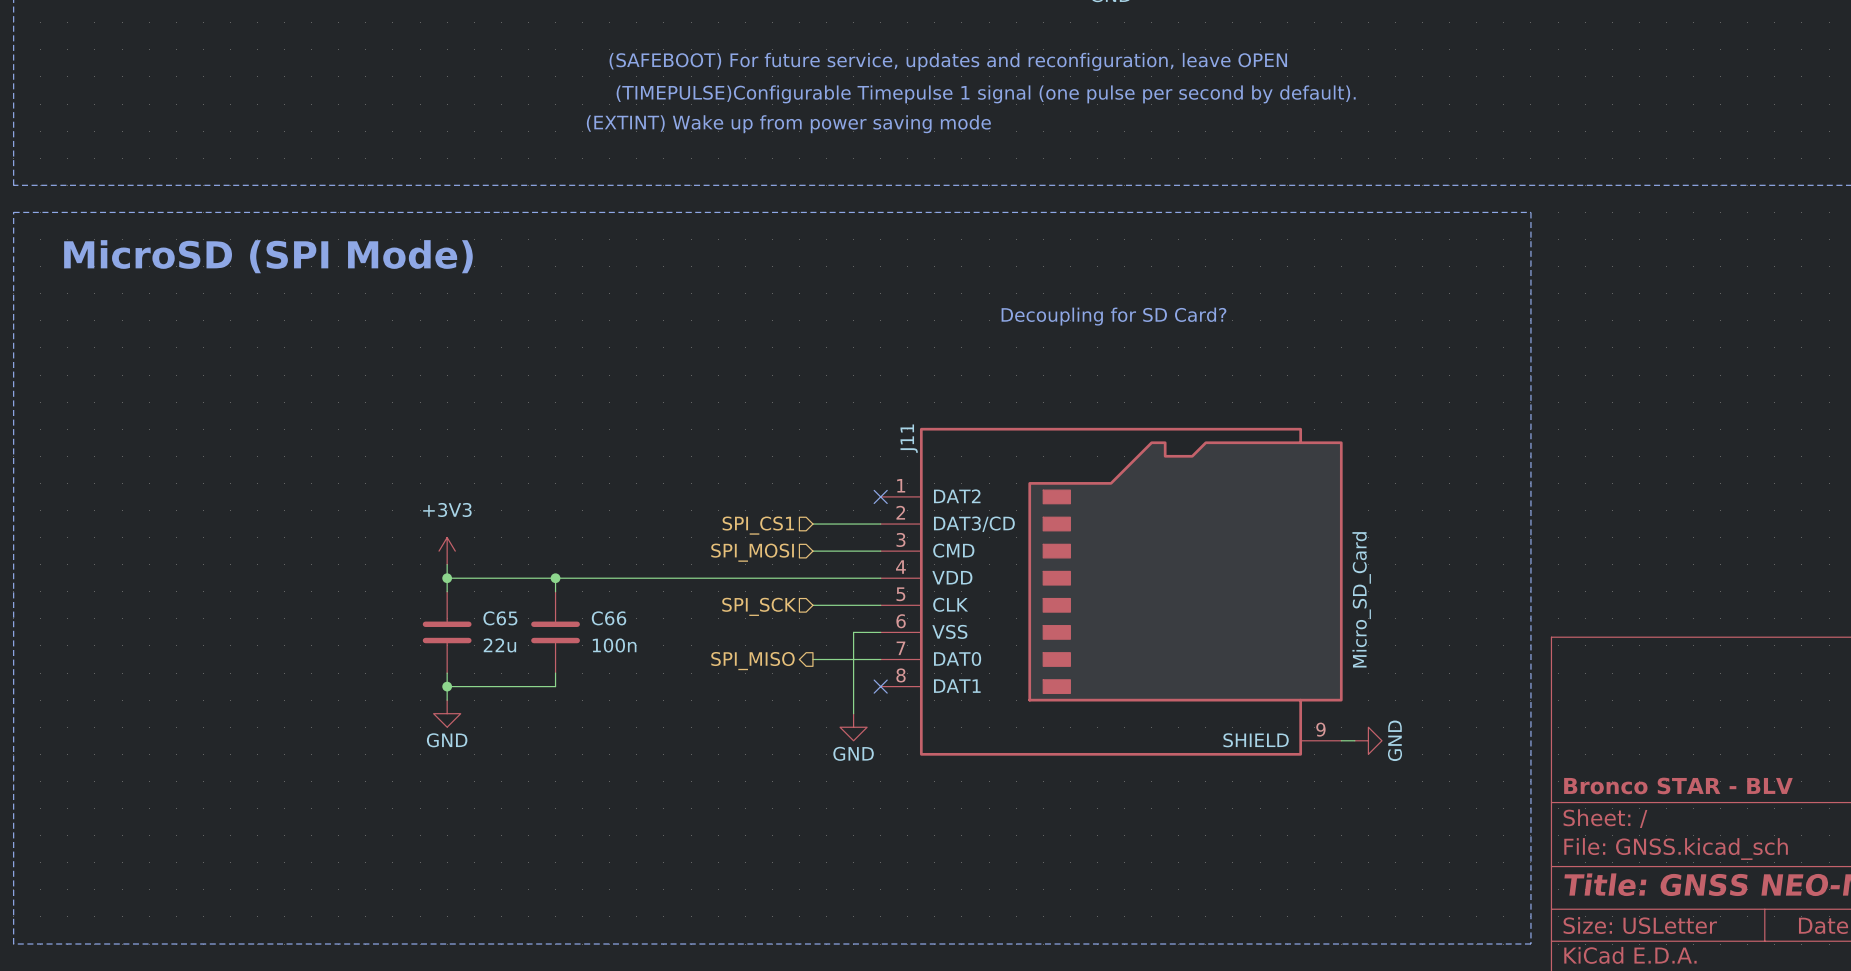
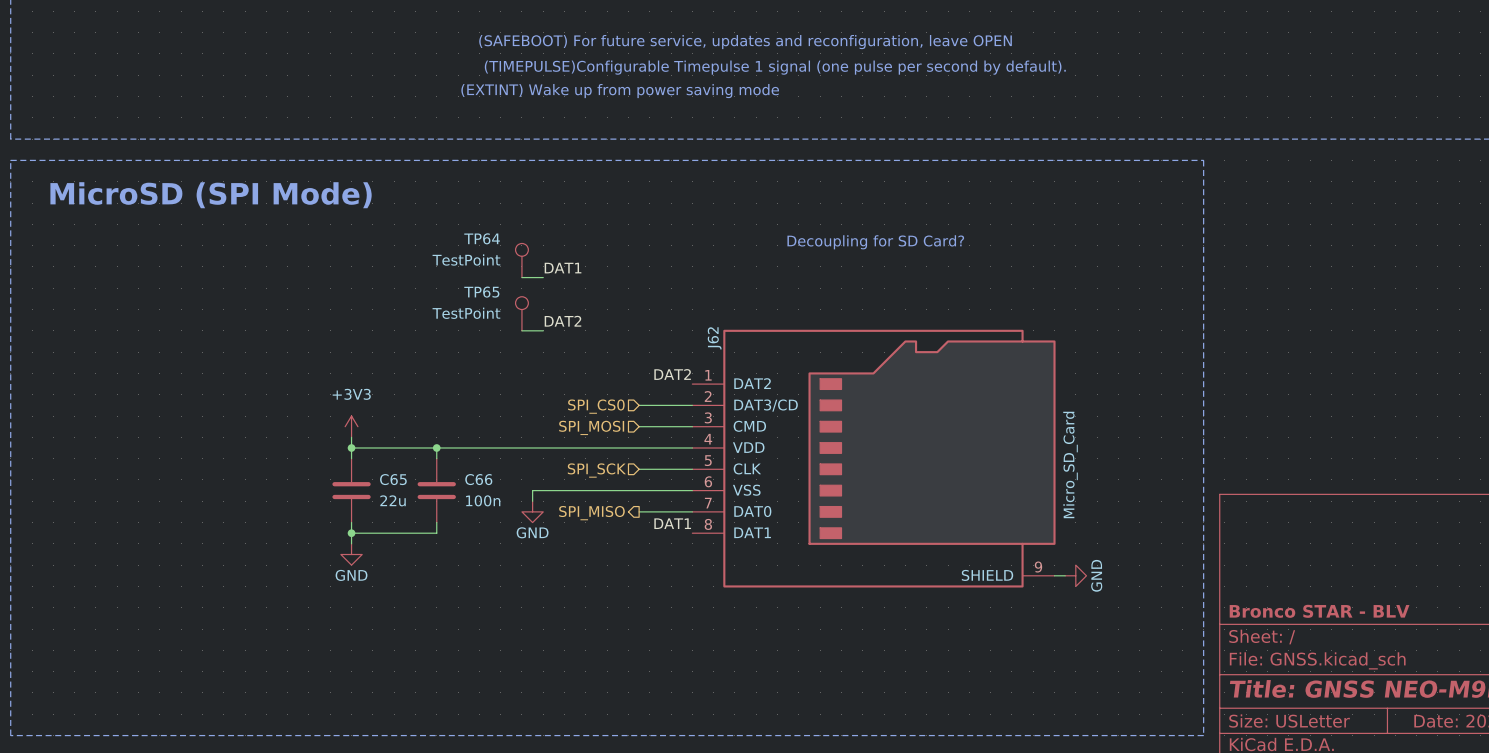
TP64: none -> TestPoint (521, 260)
label: none -> DAT1 (563, 268)
wire: none -> (521, 277) (543, 277)
TP65: none -> TestPoint (521, 313)
label: none -> DAT2 (562, 321)
wire: none -> (521, 330) (543, 330)
J11 name: J11 (909, 438) -> J62 (714, 338)
label: none -> DAT2 (672, 374)
no-connect mark: (880, 496) -> none
hierarchical label: SPI_CS1 (758, 525) -> SPI_CS0 (596, 406)
wire: (853, 632) (853, 713) -> (671, 490) (532, 490) (532, 501)
label: none -> DAT1 (672, 523)
no-connect mark: (880, 686) -> none
power symbol position: GND (853, 727) -> GND (532, 511)

